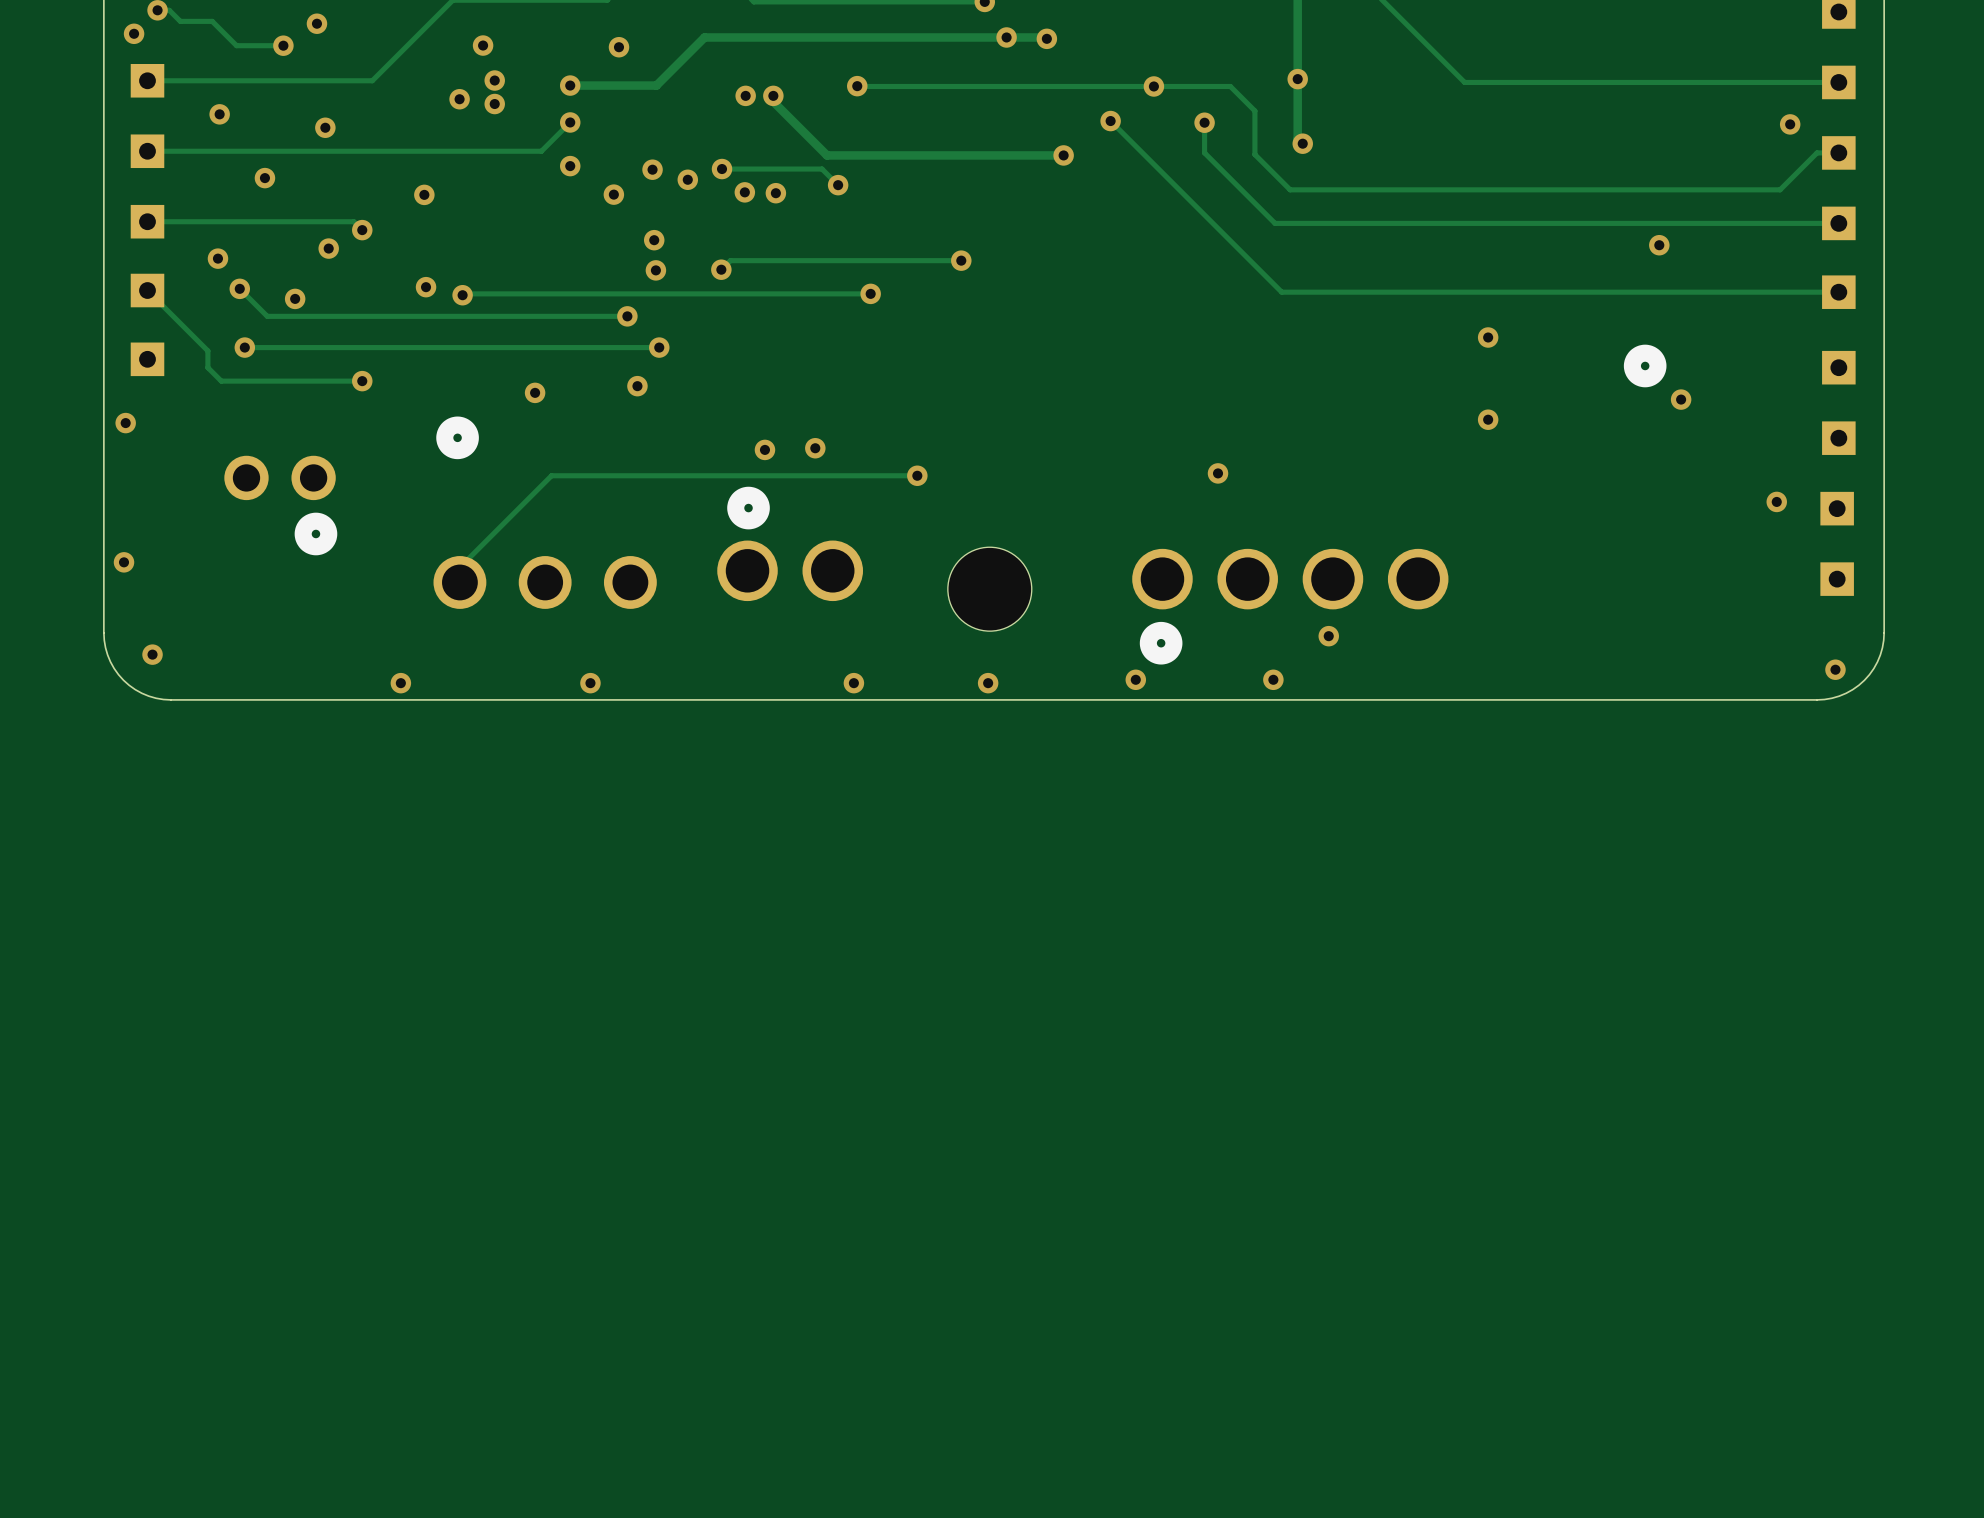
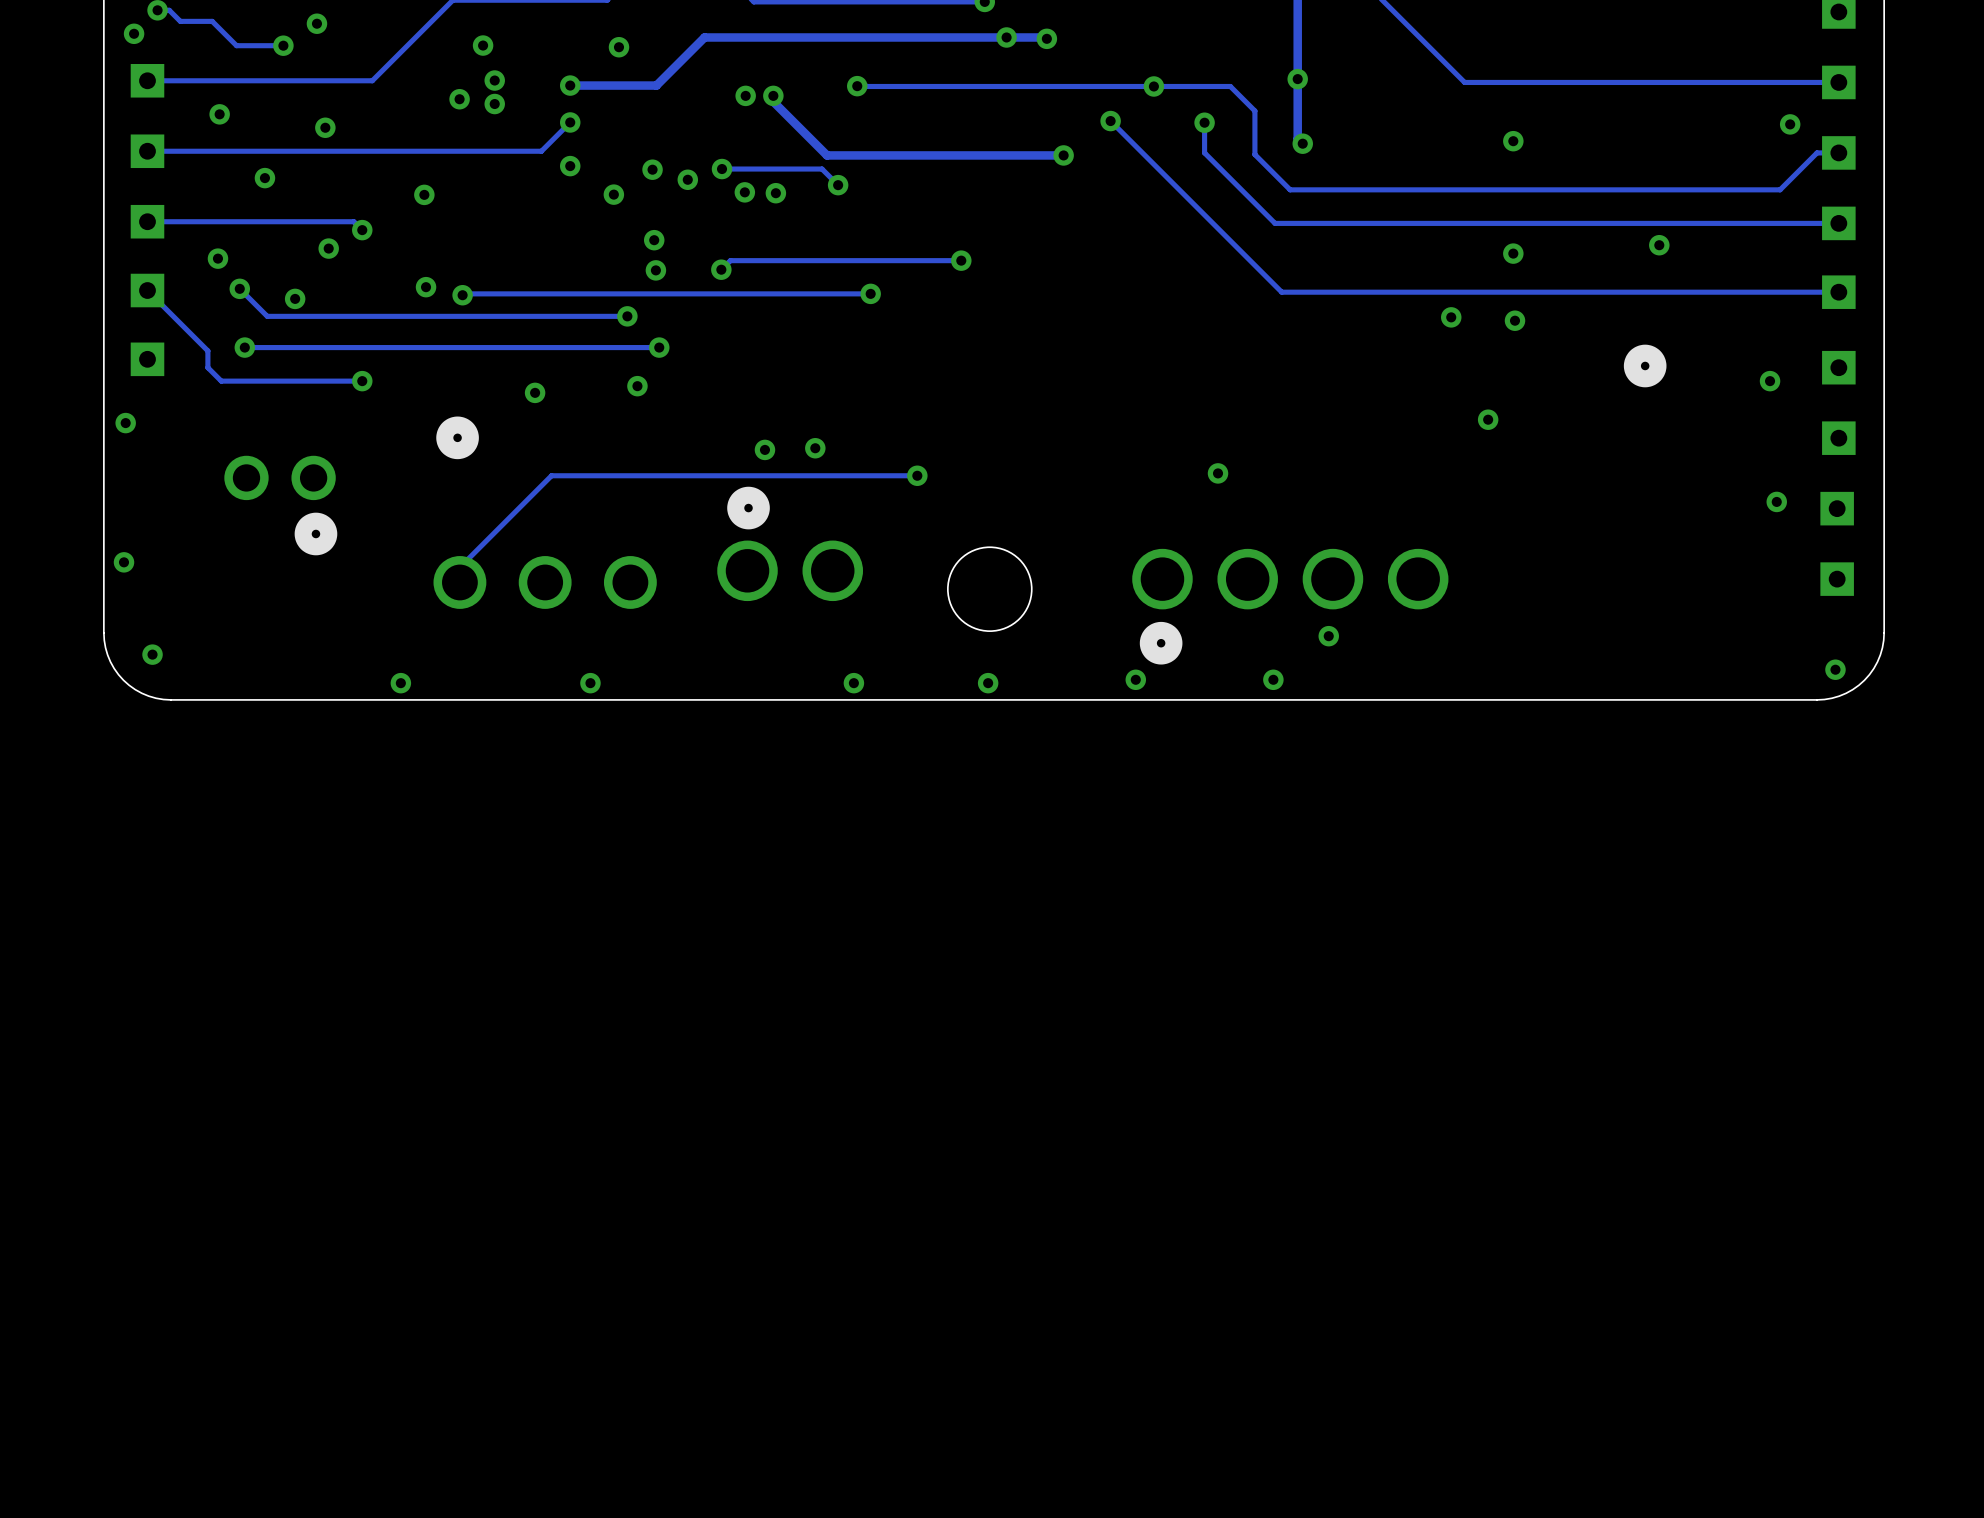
via: none -> (1513, 141)
via: none -> (1513, 253)
via: none -> (1451, 317)
via: none -> (1515, 320)
via: (1488, 337) -> none
via position: (1681, 399) -> (1770, 381)

